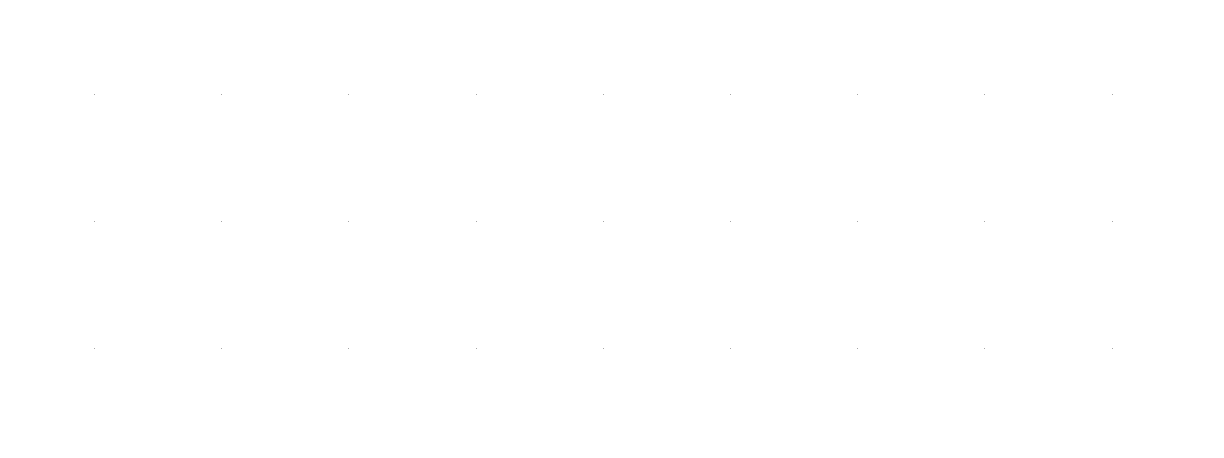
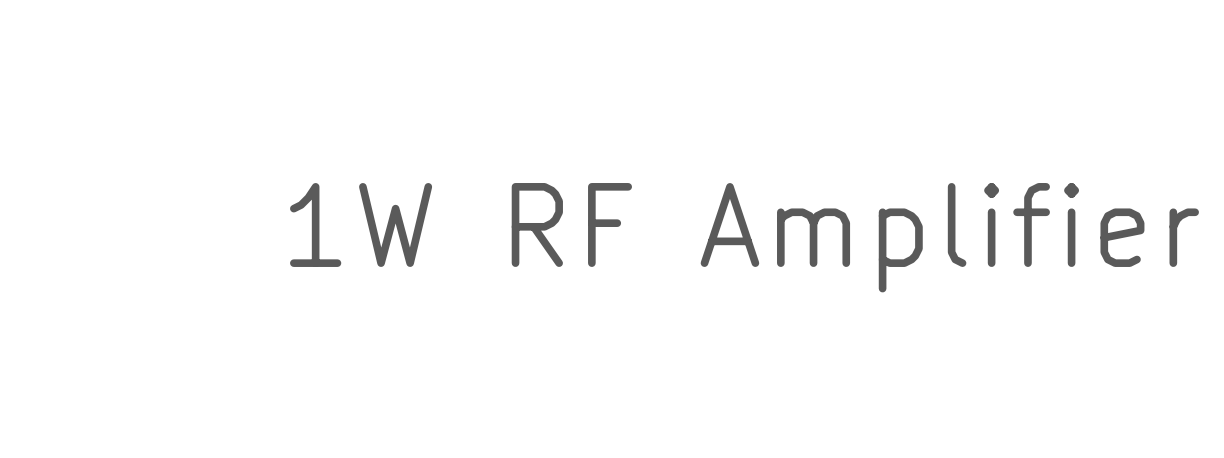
text: none -> 1W RF Amplifier (744, 237)

